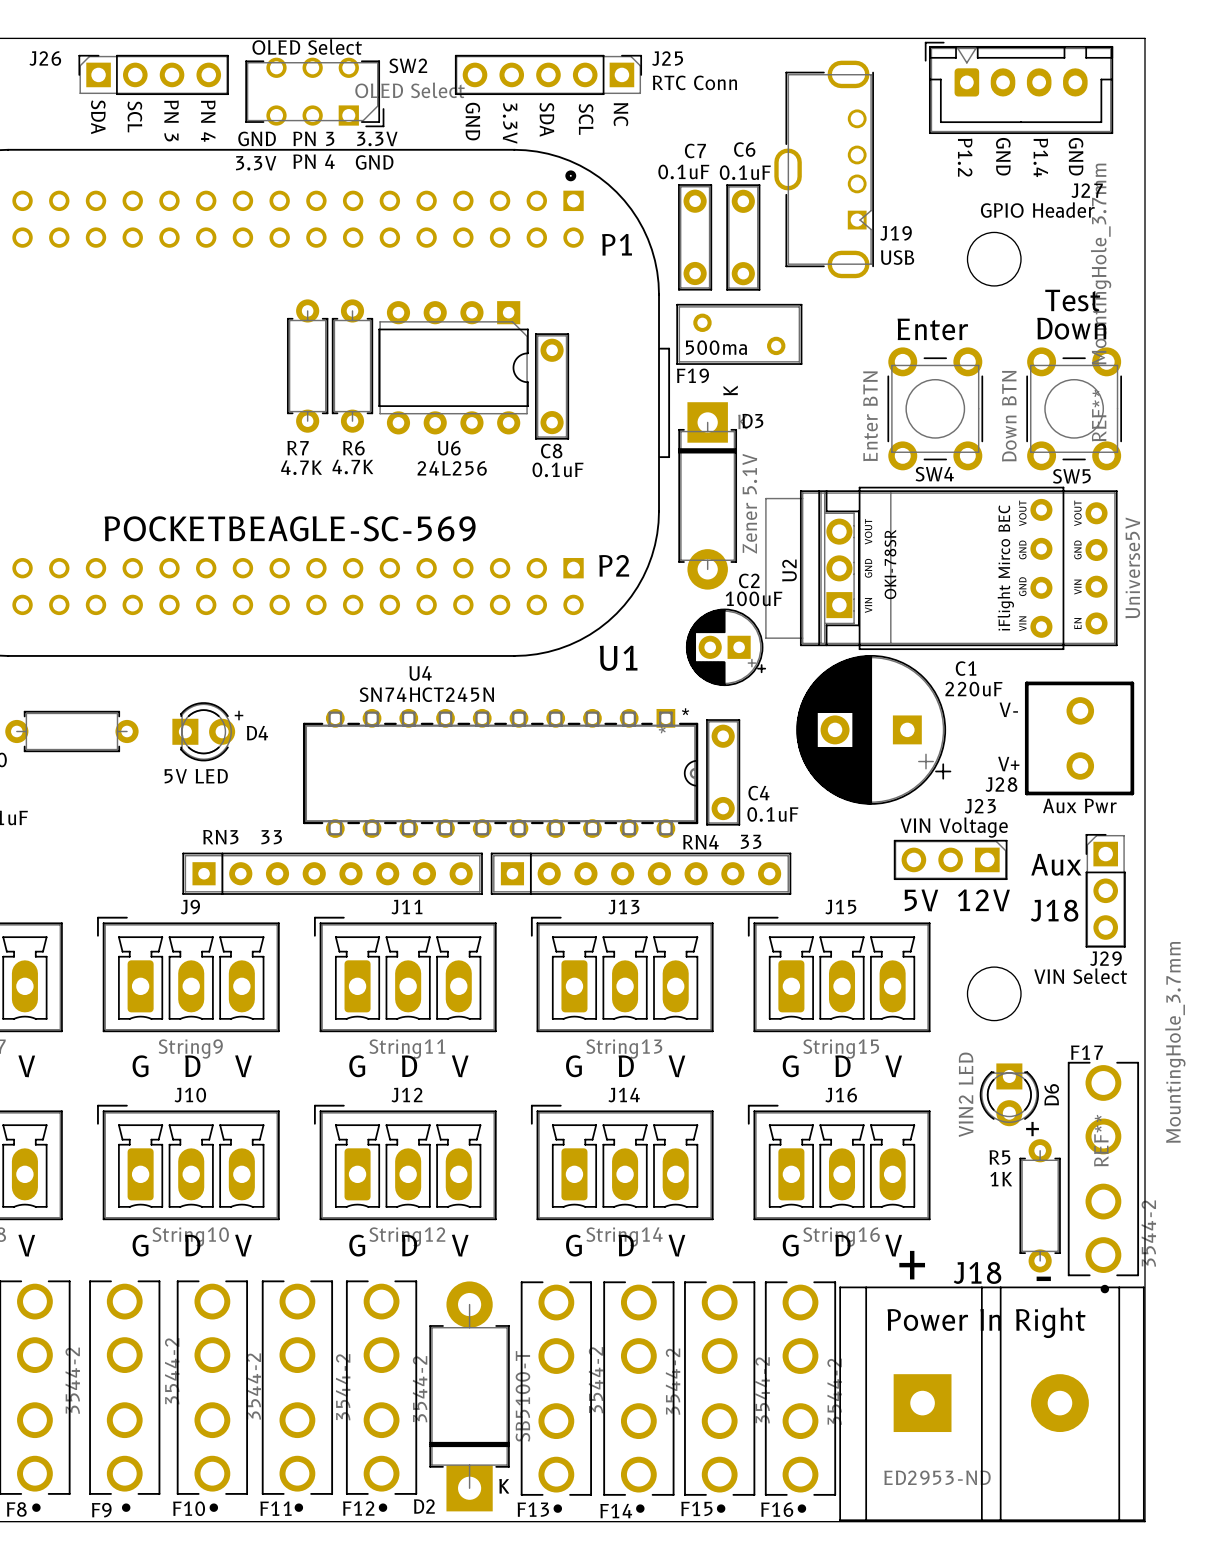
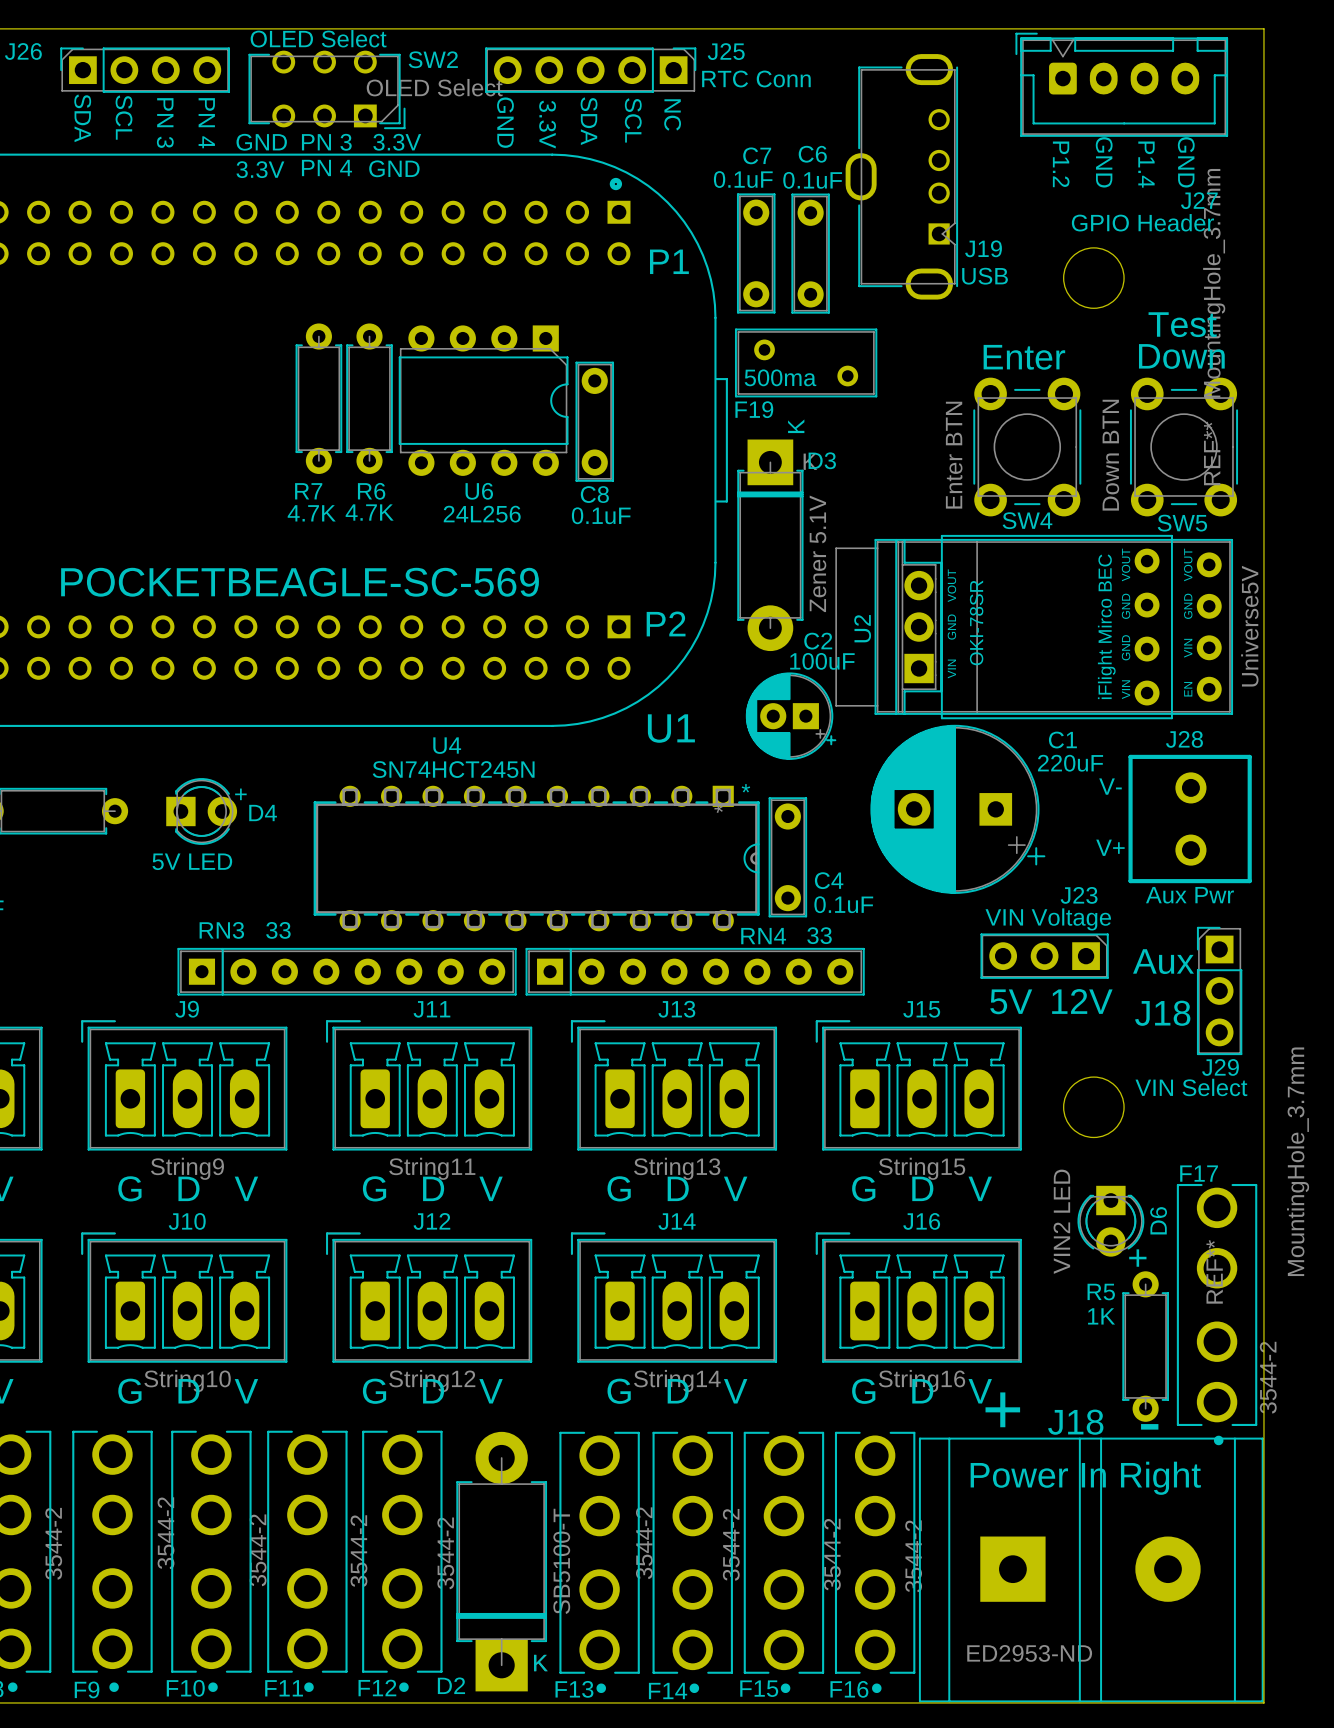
J28 name position: J28 (1001, 784) -> J28 (1184, 739)

